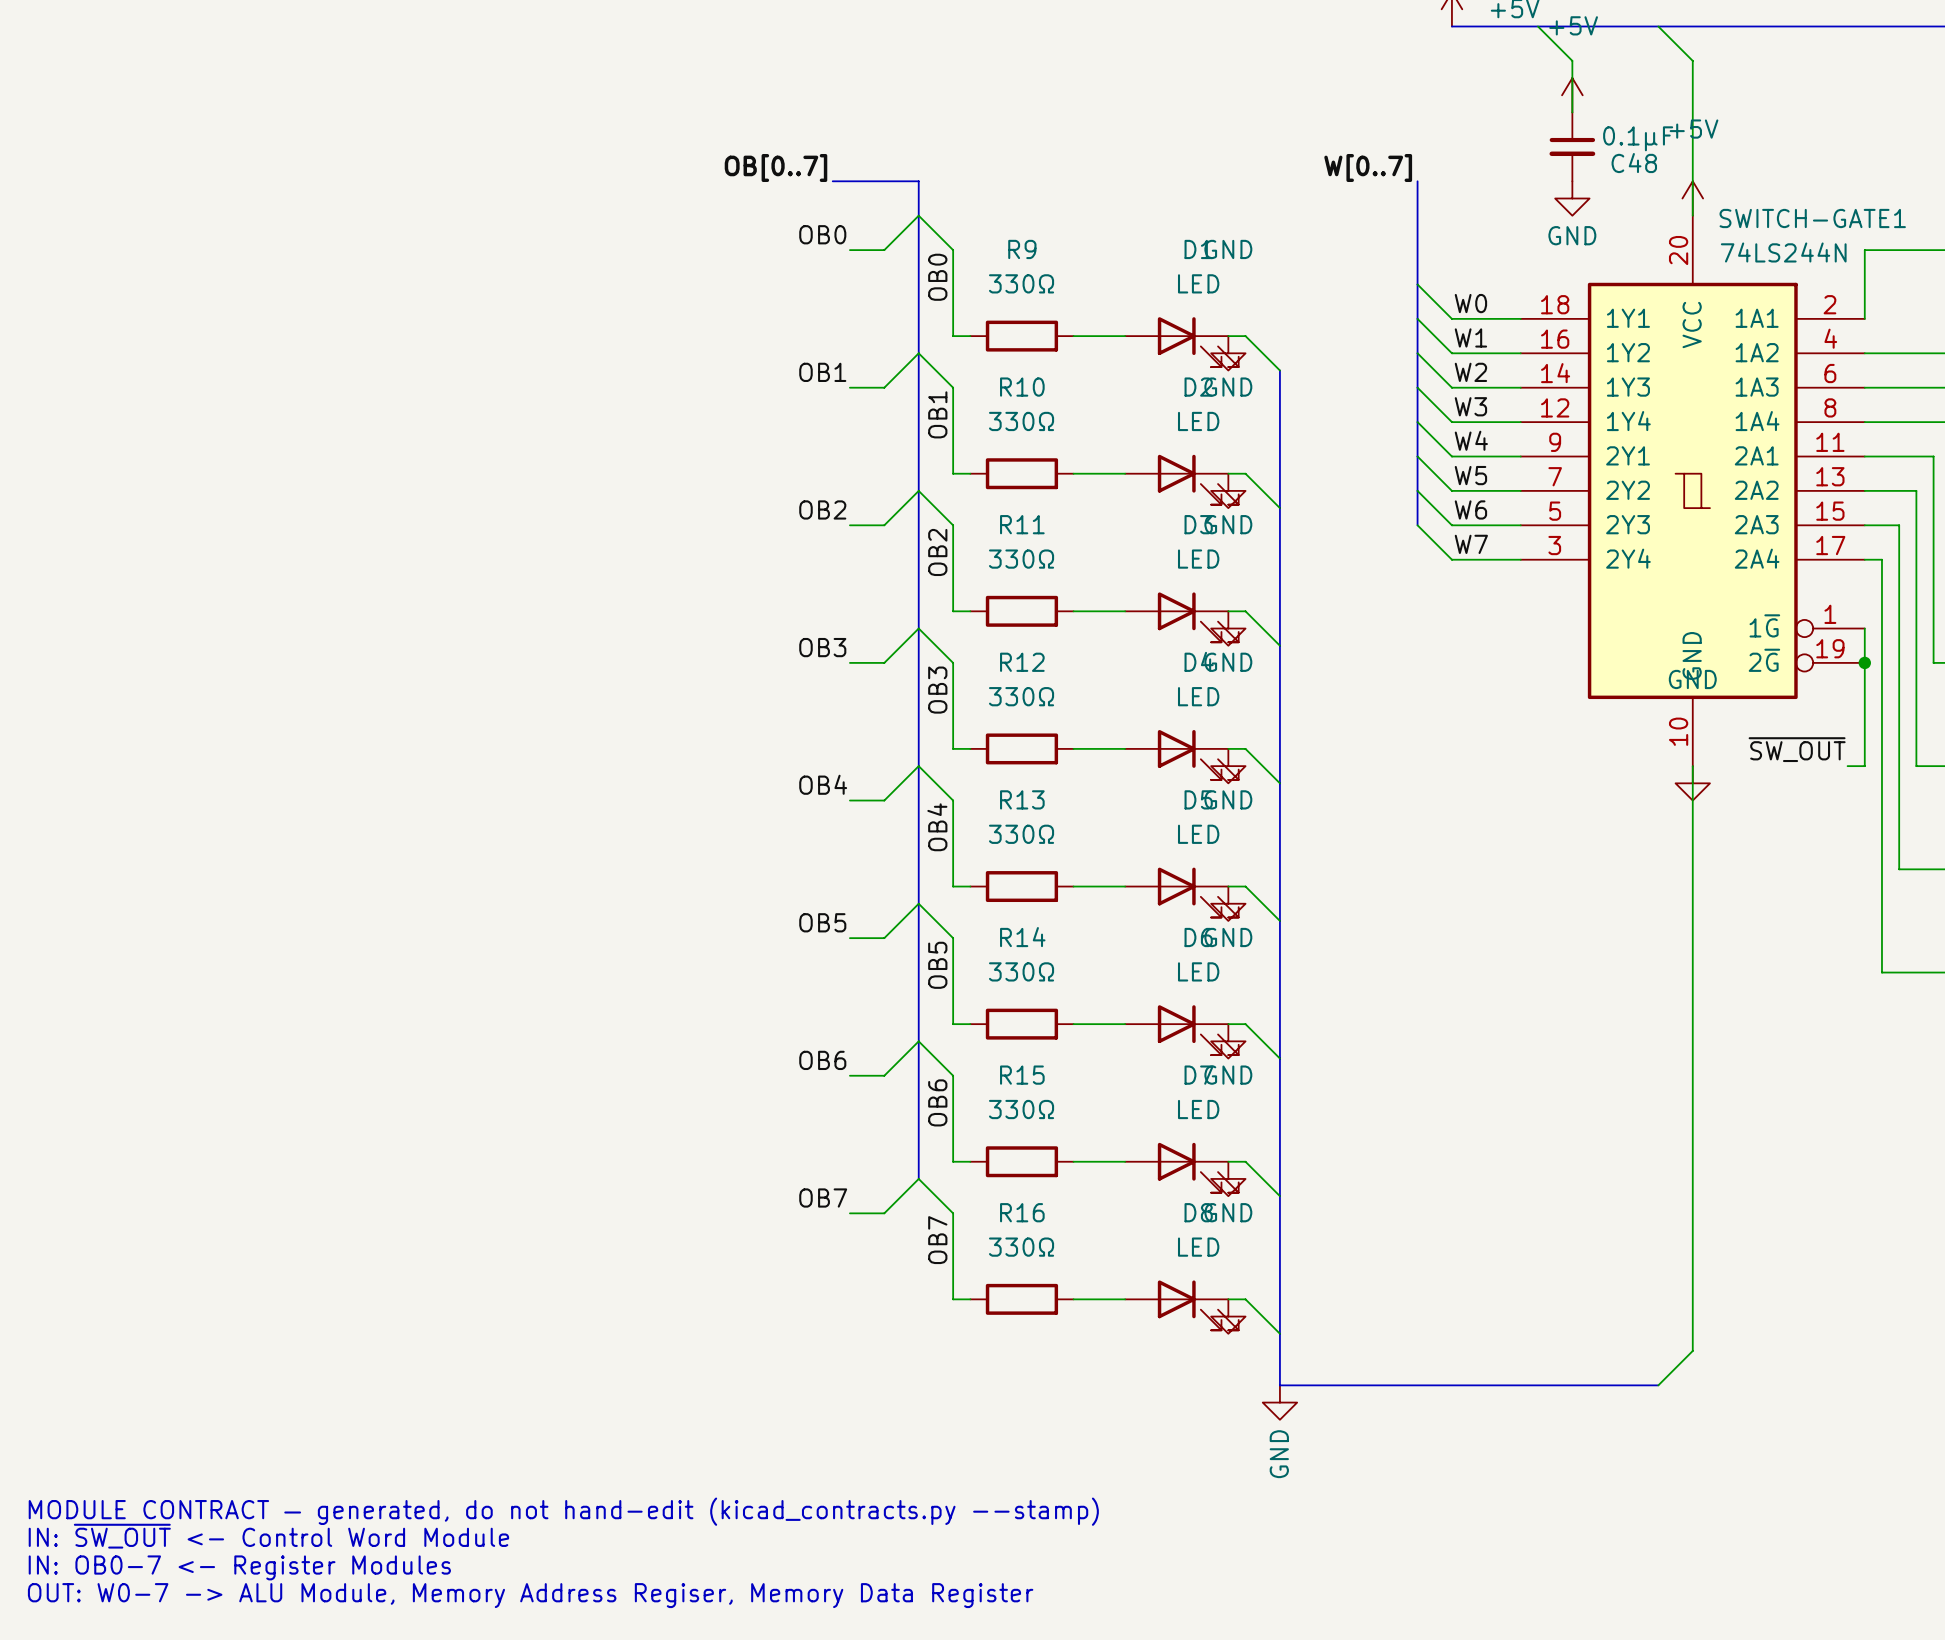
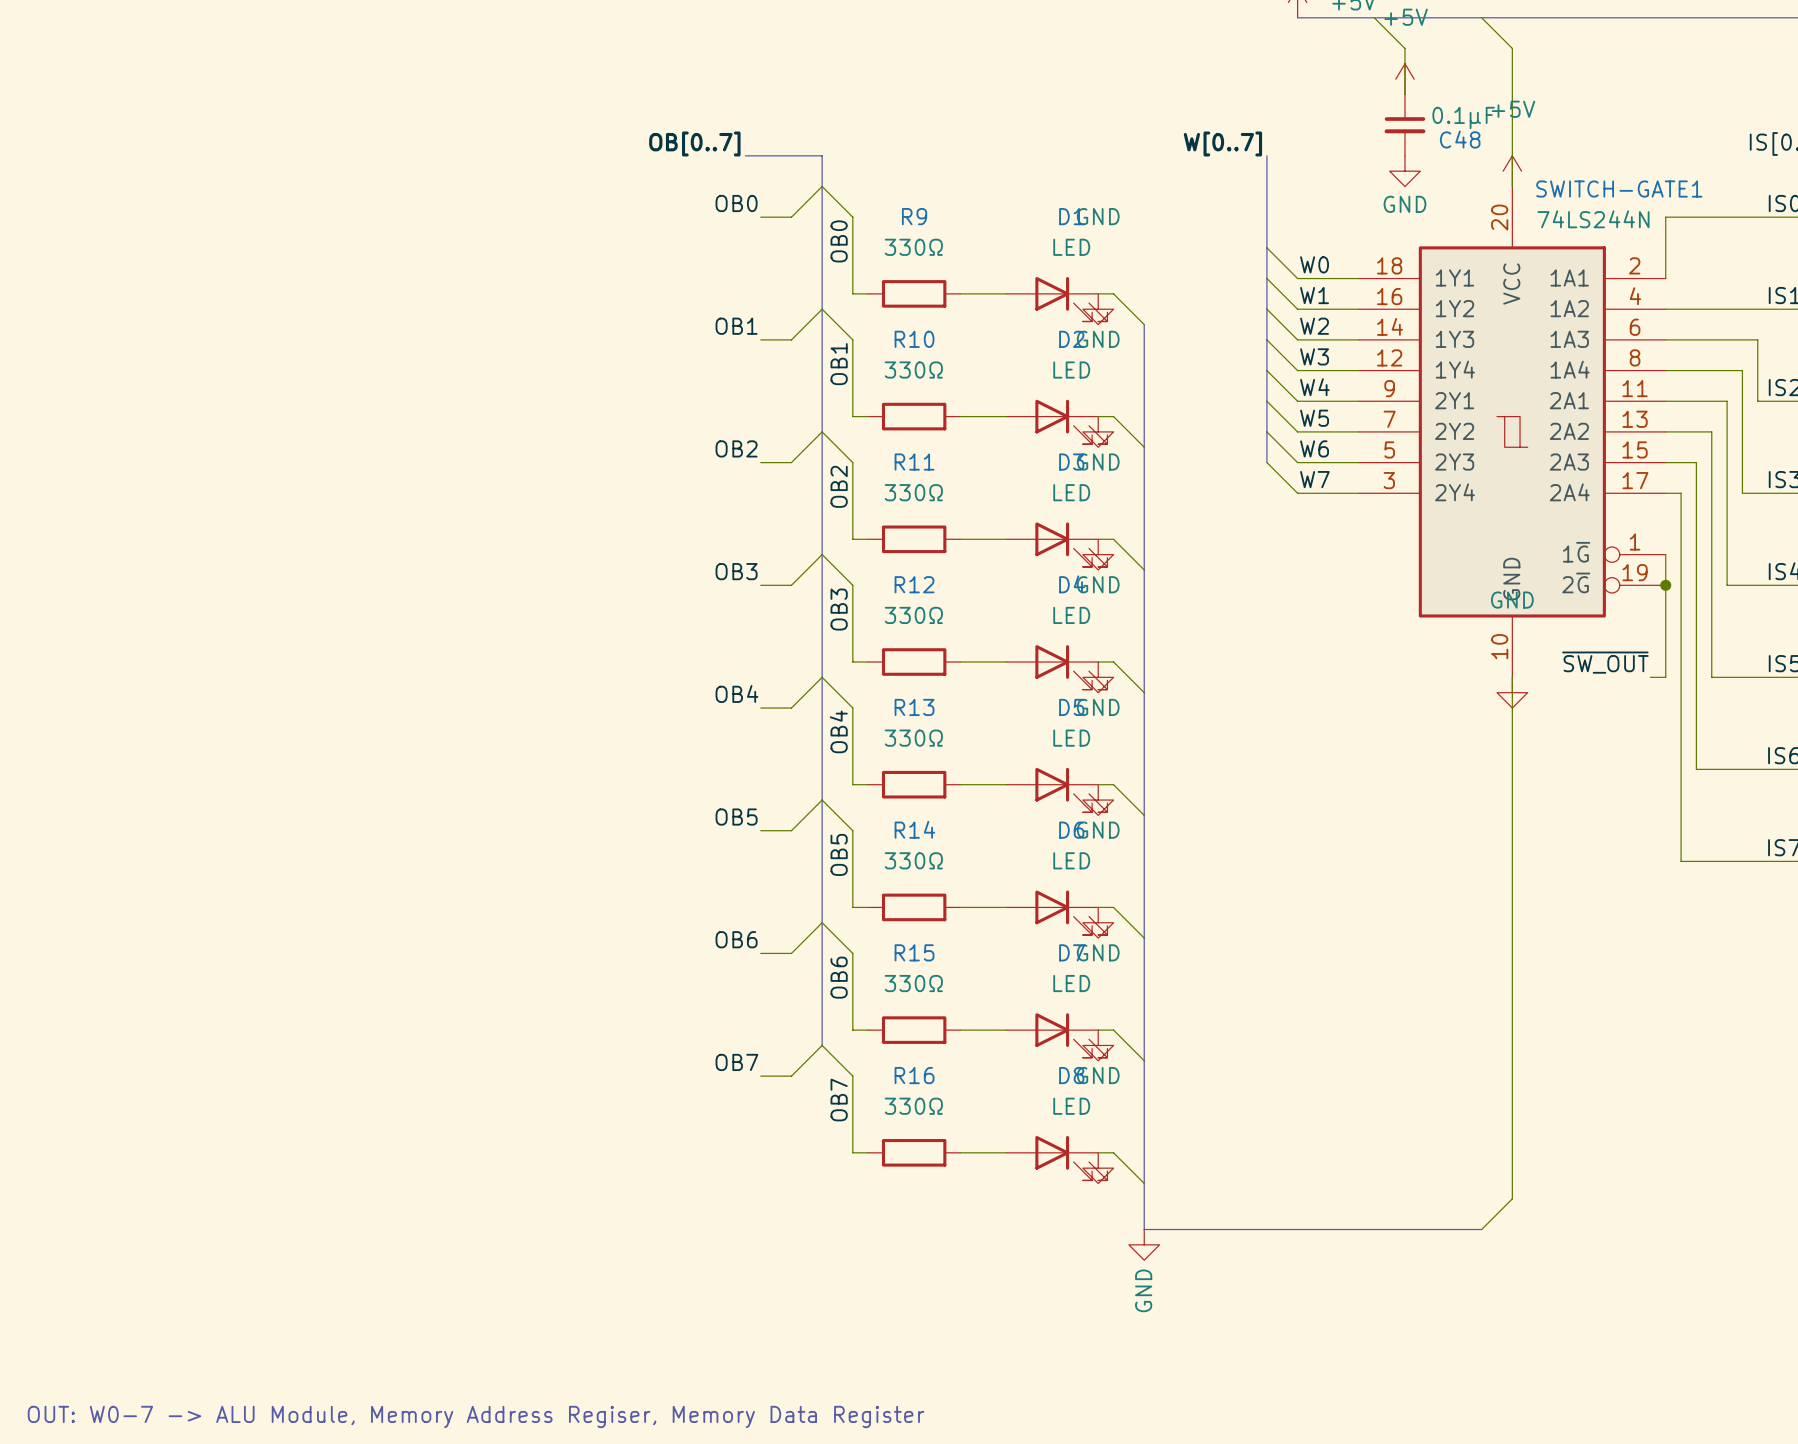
text: MODULE CONTRACT — generated, do not hand-edit (kicad_contracts.py --stamp) (563, 1511) -> none
text: IN: ~{SW_OUT} <- Control Word Module (268, 1536) -> none
text: IN: OB0-7 <- Register Modules (239, 1567) -> none

